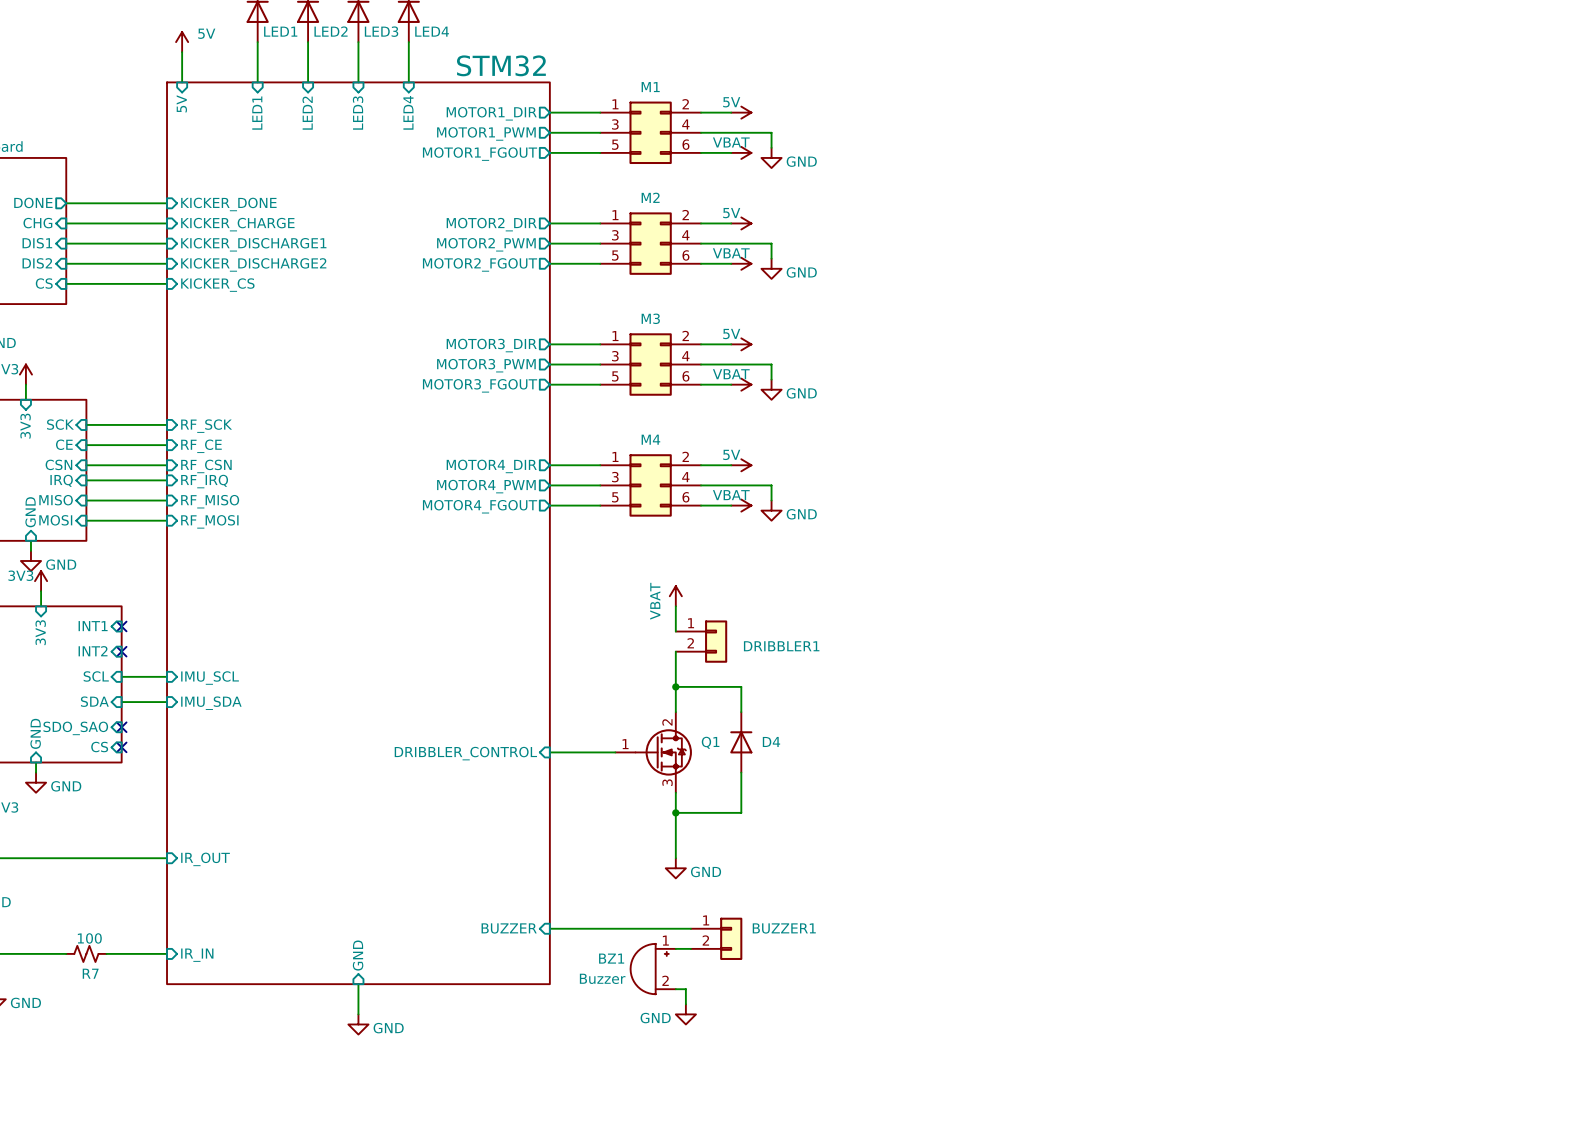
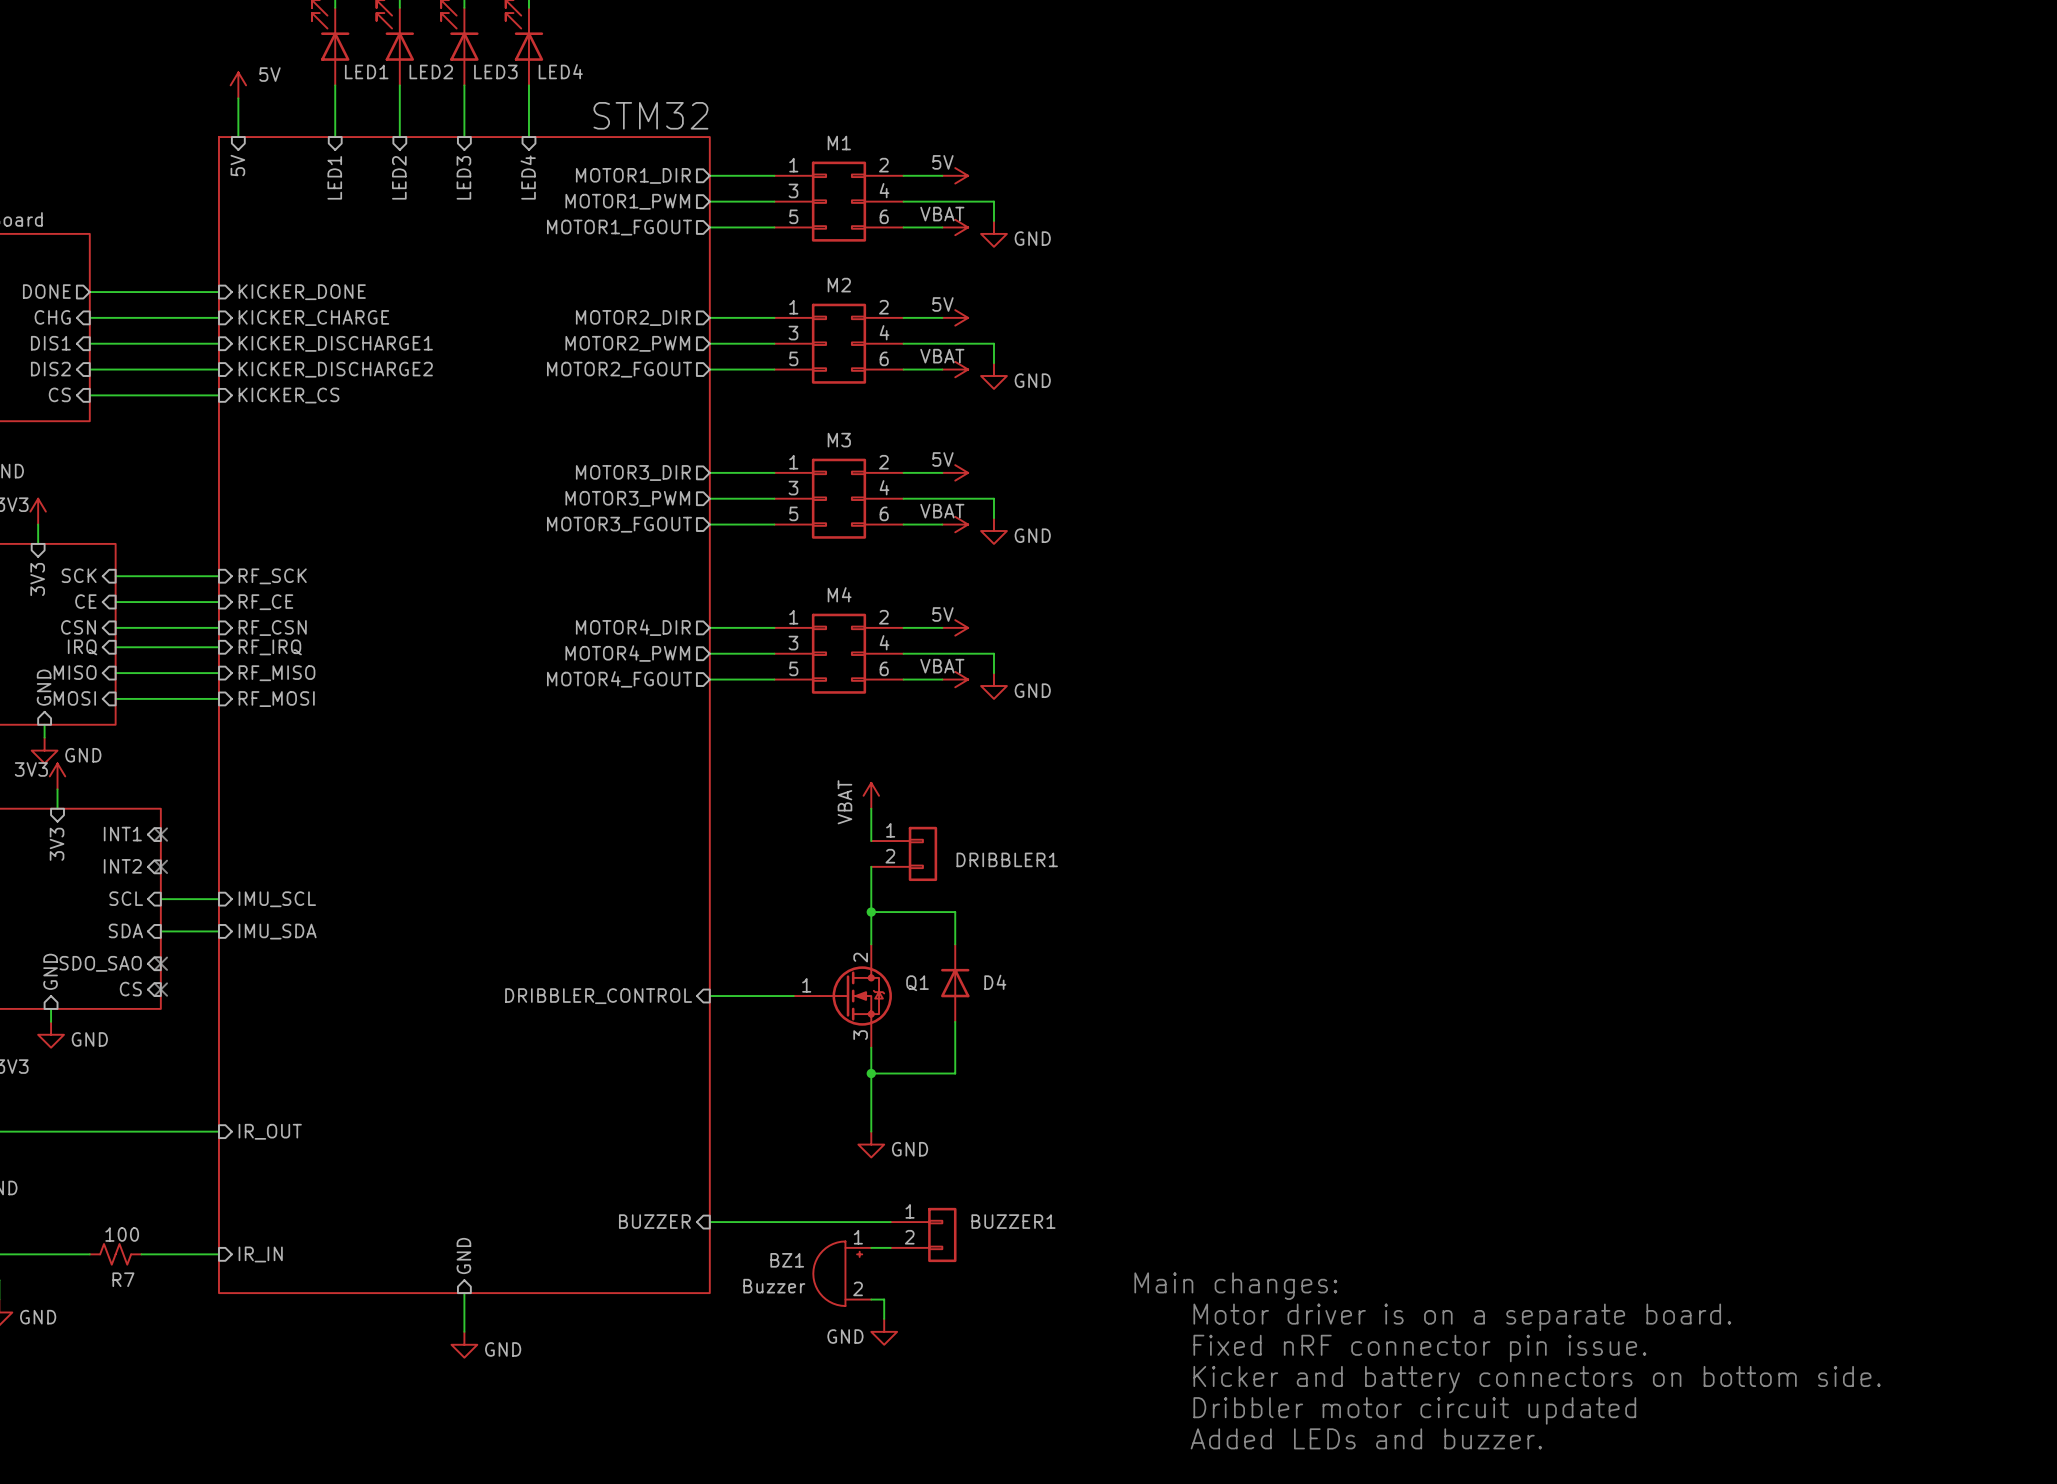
text: none -> Main changes: (1235, 1286)
text: none -> Motor driver is on a separate board. (1462, 1317)
text: none -> Fixed nRF connector pin issue. (1419, 1348)
text: none -> Kicker and battery connectors on bottom side. (1537, 1379)
text: none -> Dribbler motor circuit updated (1414, 1410)
text: none -> Added LEDs and buzzer. (1366, 1438)

